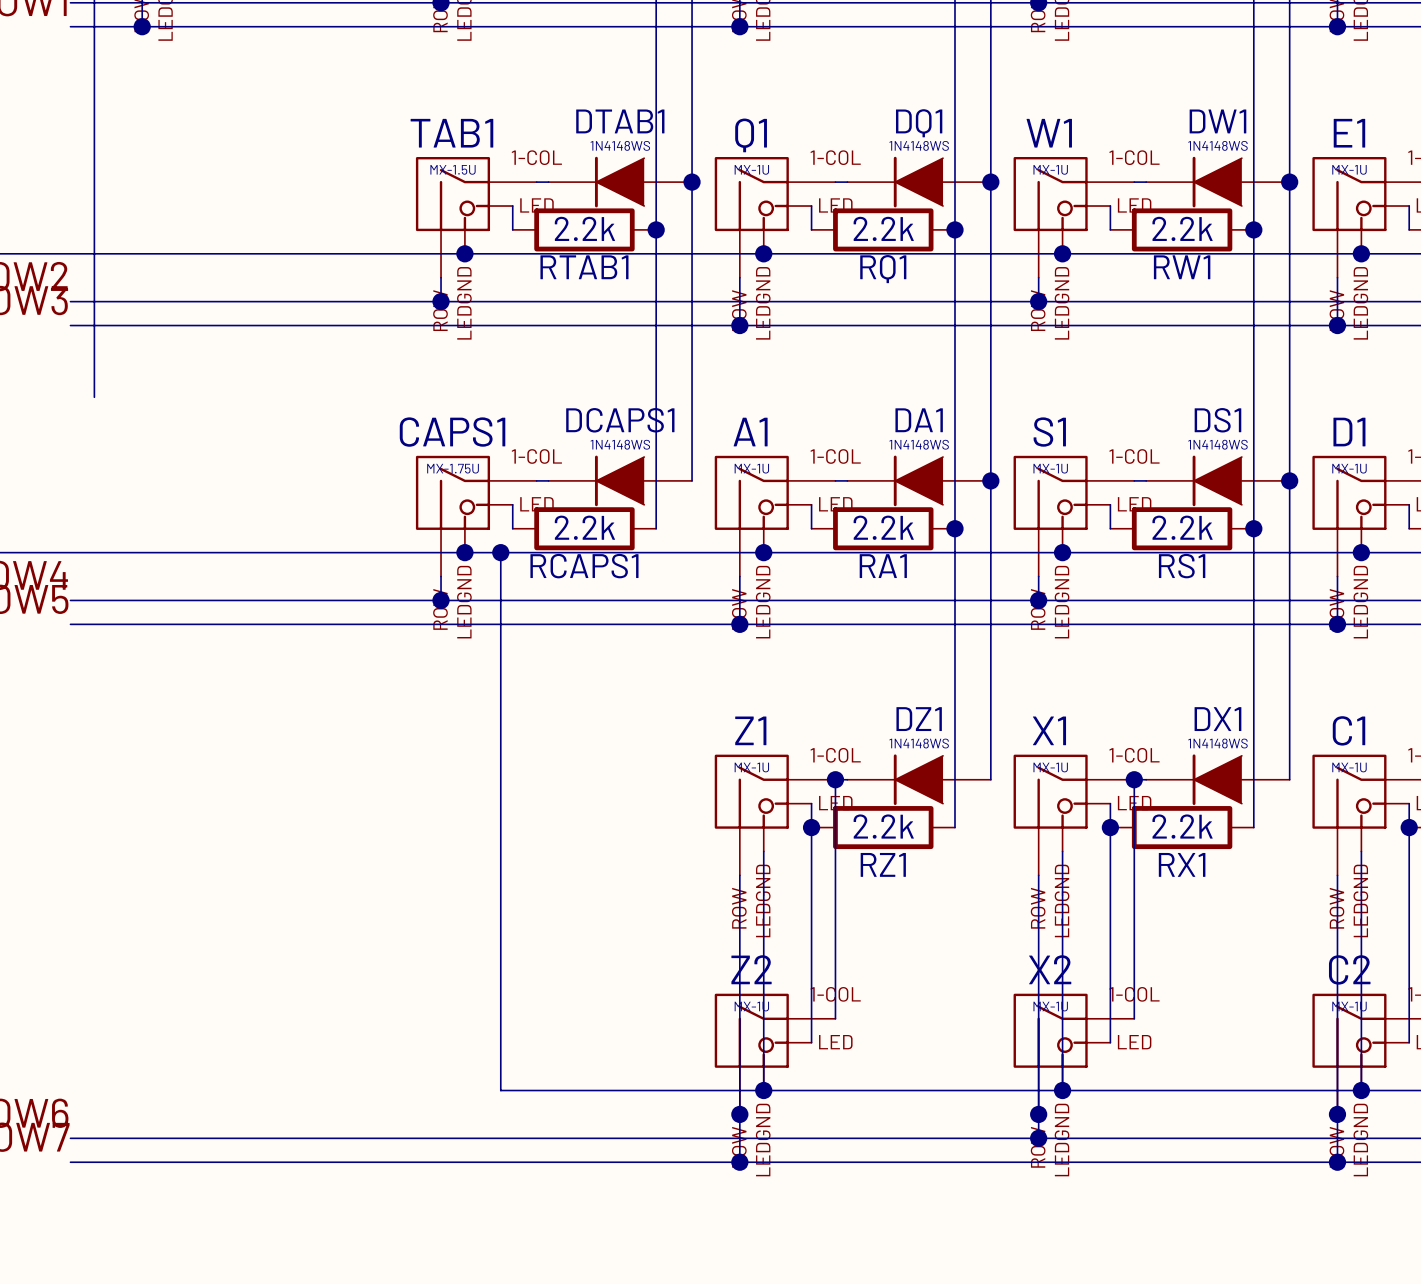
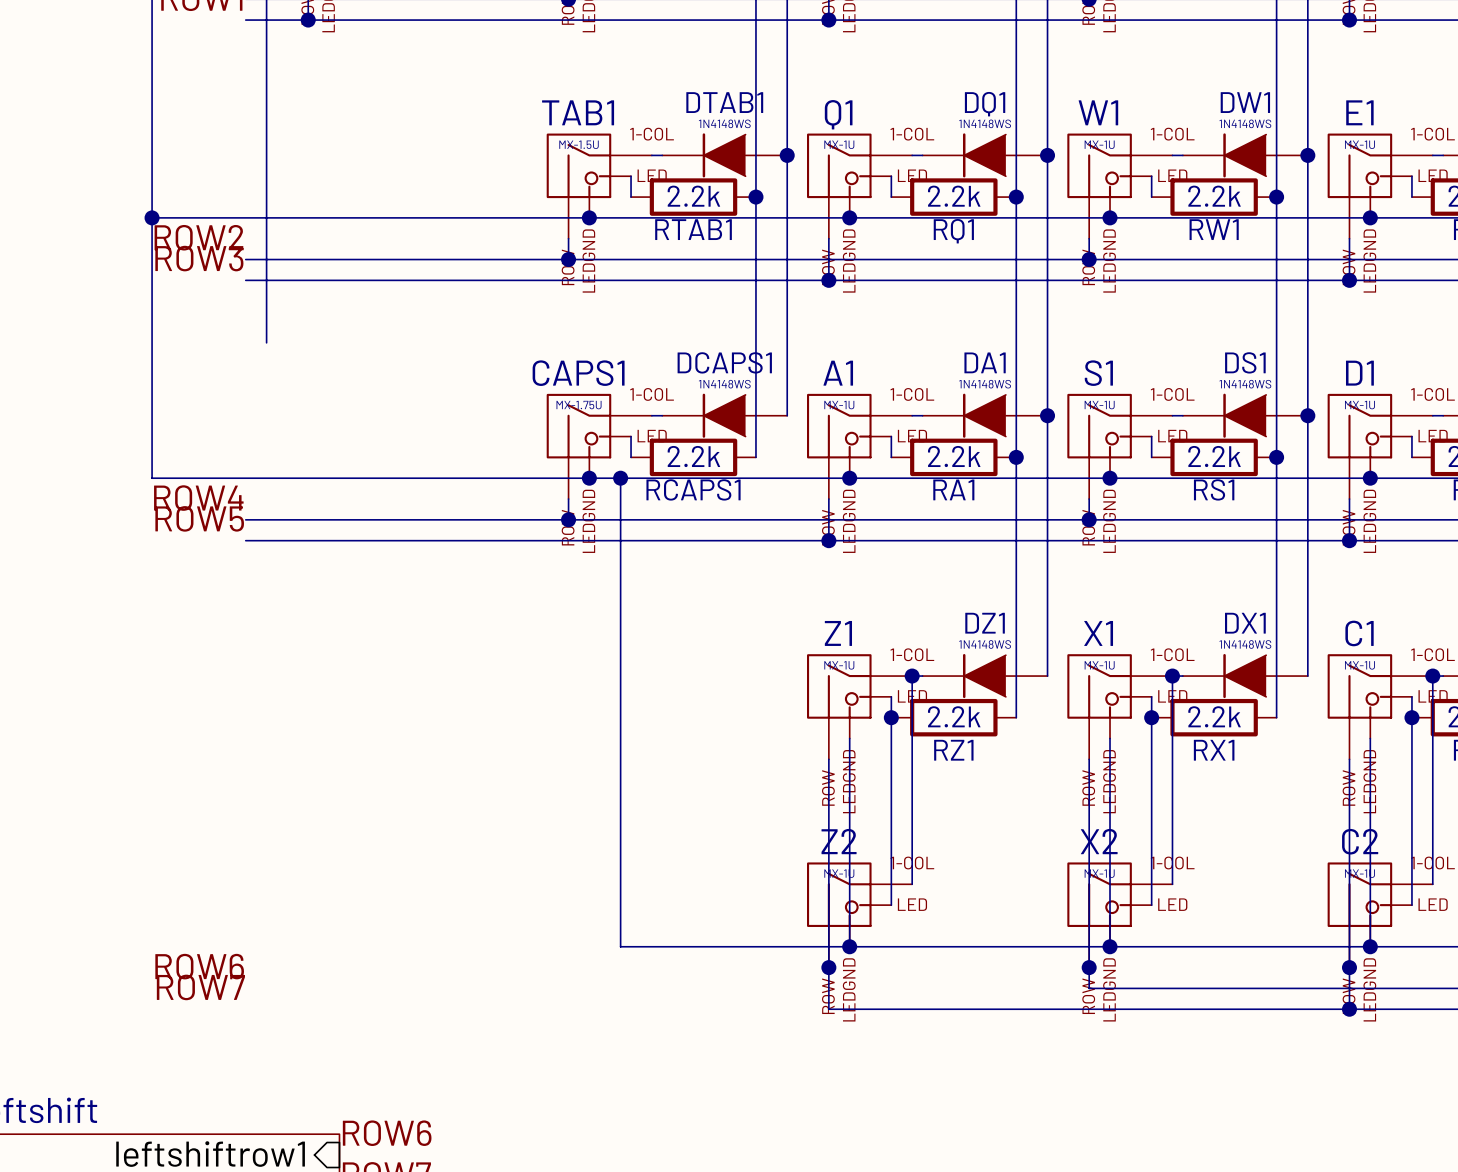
wire: (70, 1138) (1038, 1138) -> none
junction: (1038, 1138) -> none
wire: (70, 1162) (739, 1162) -> none
junction: (739, 1162) -> none

